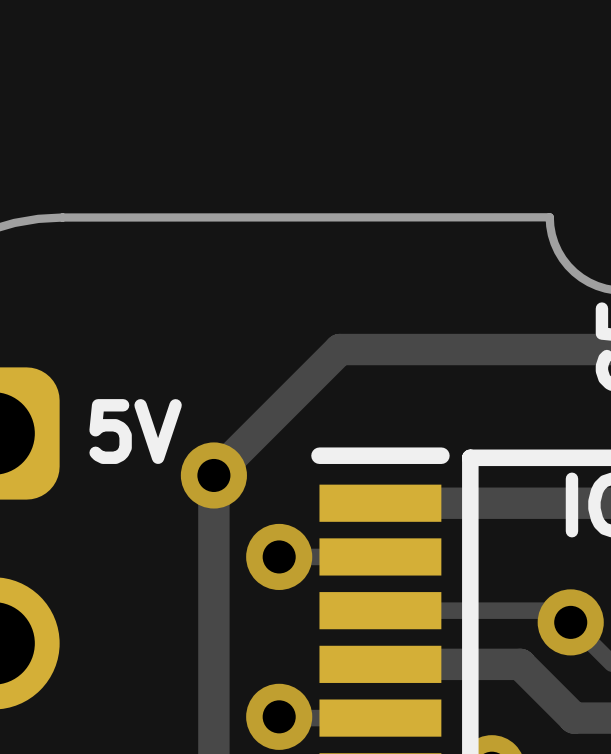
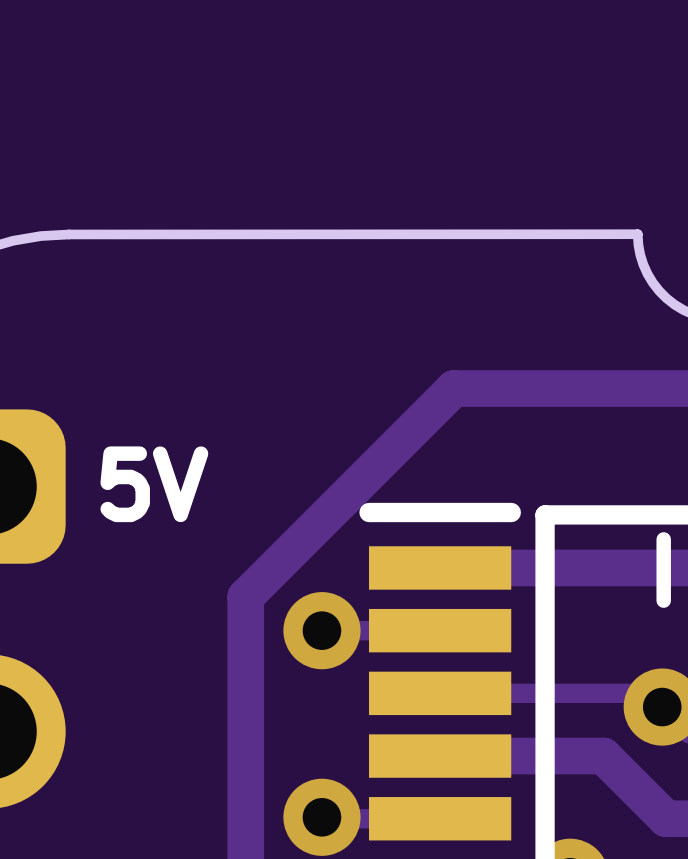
track: (392, 349) (339, 349) (213, 475) (213, 527) -> (454, 388) (245, 596)
via: (213, 475) -> none

